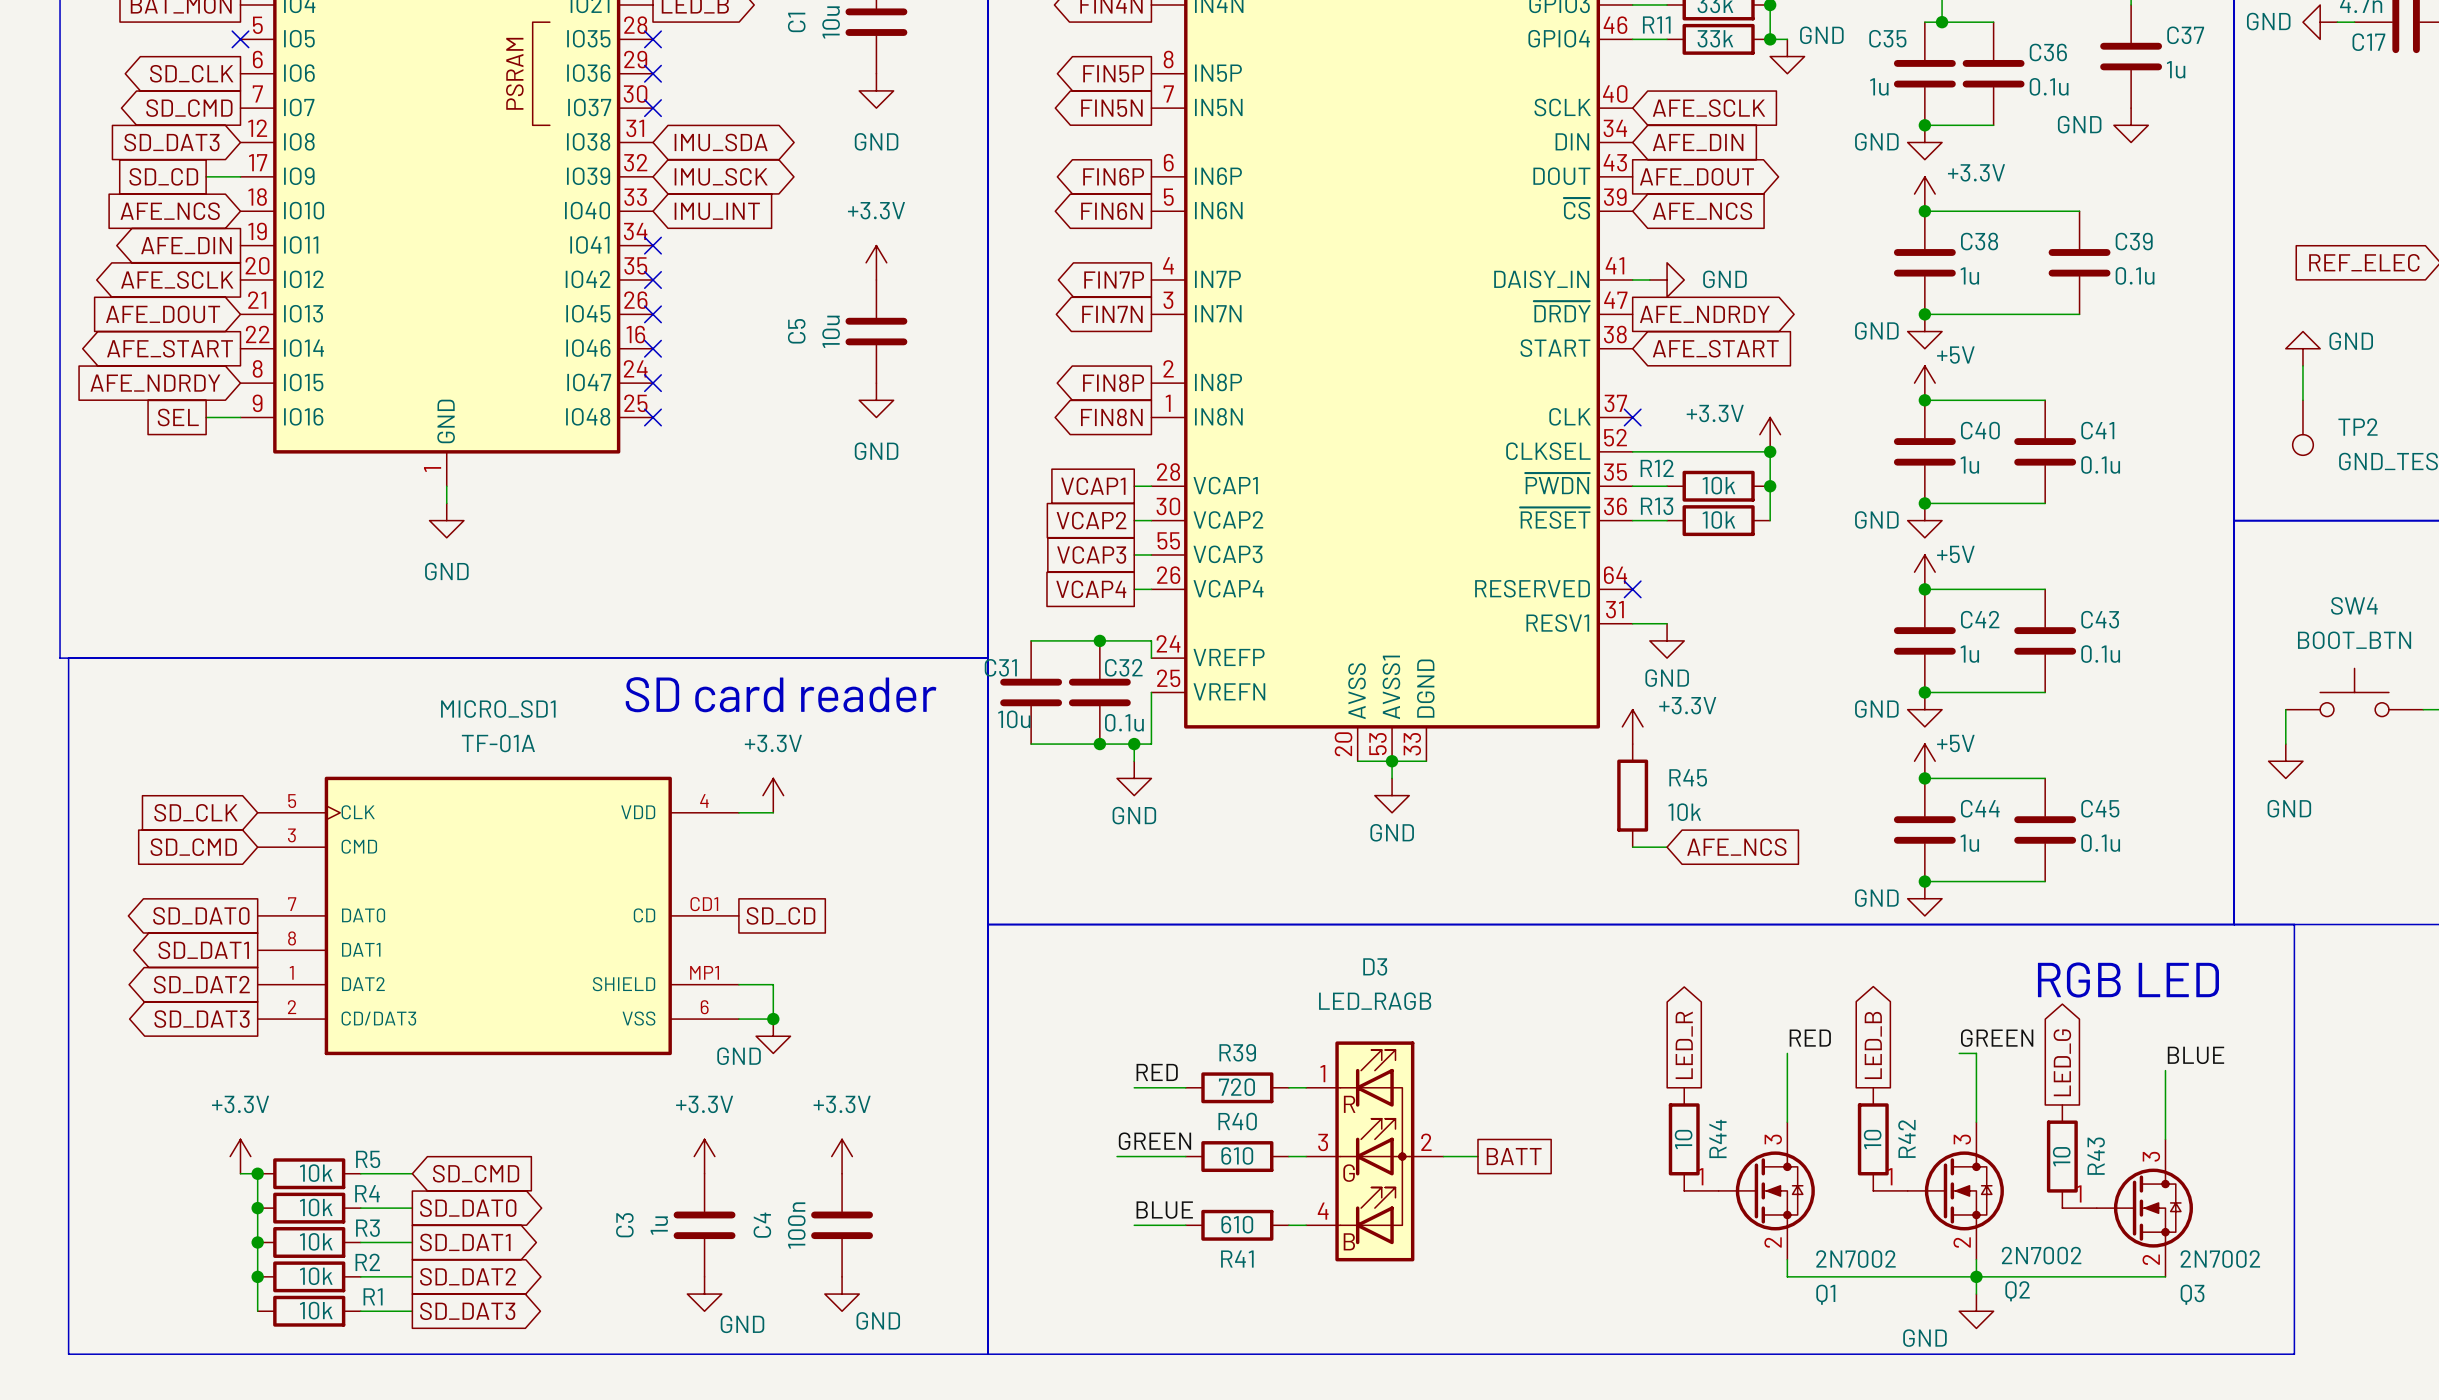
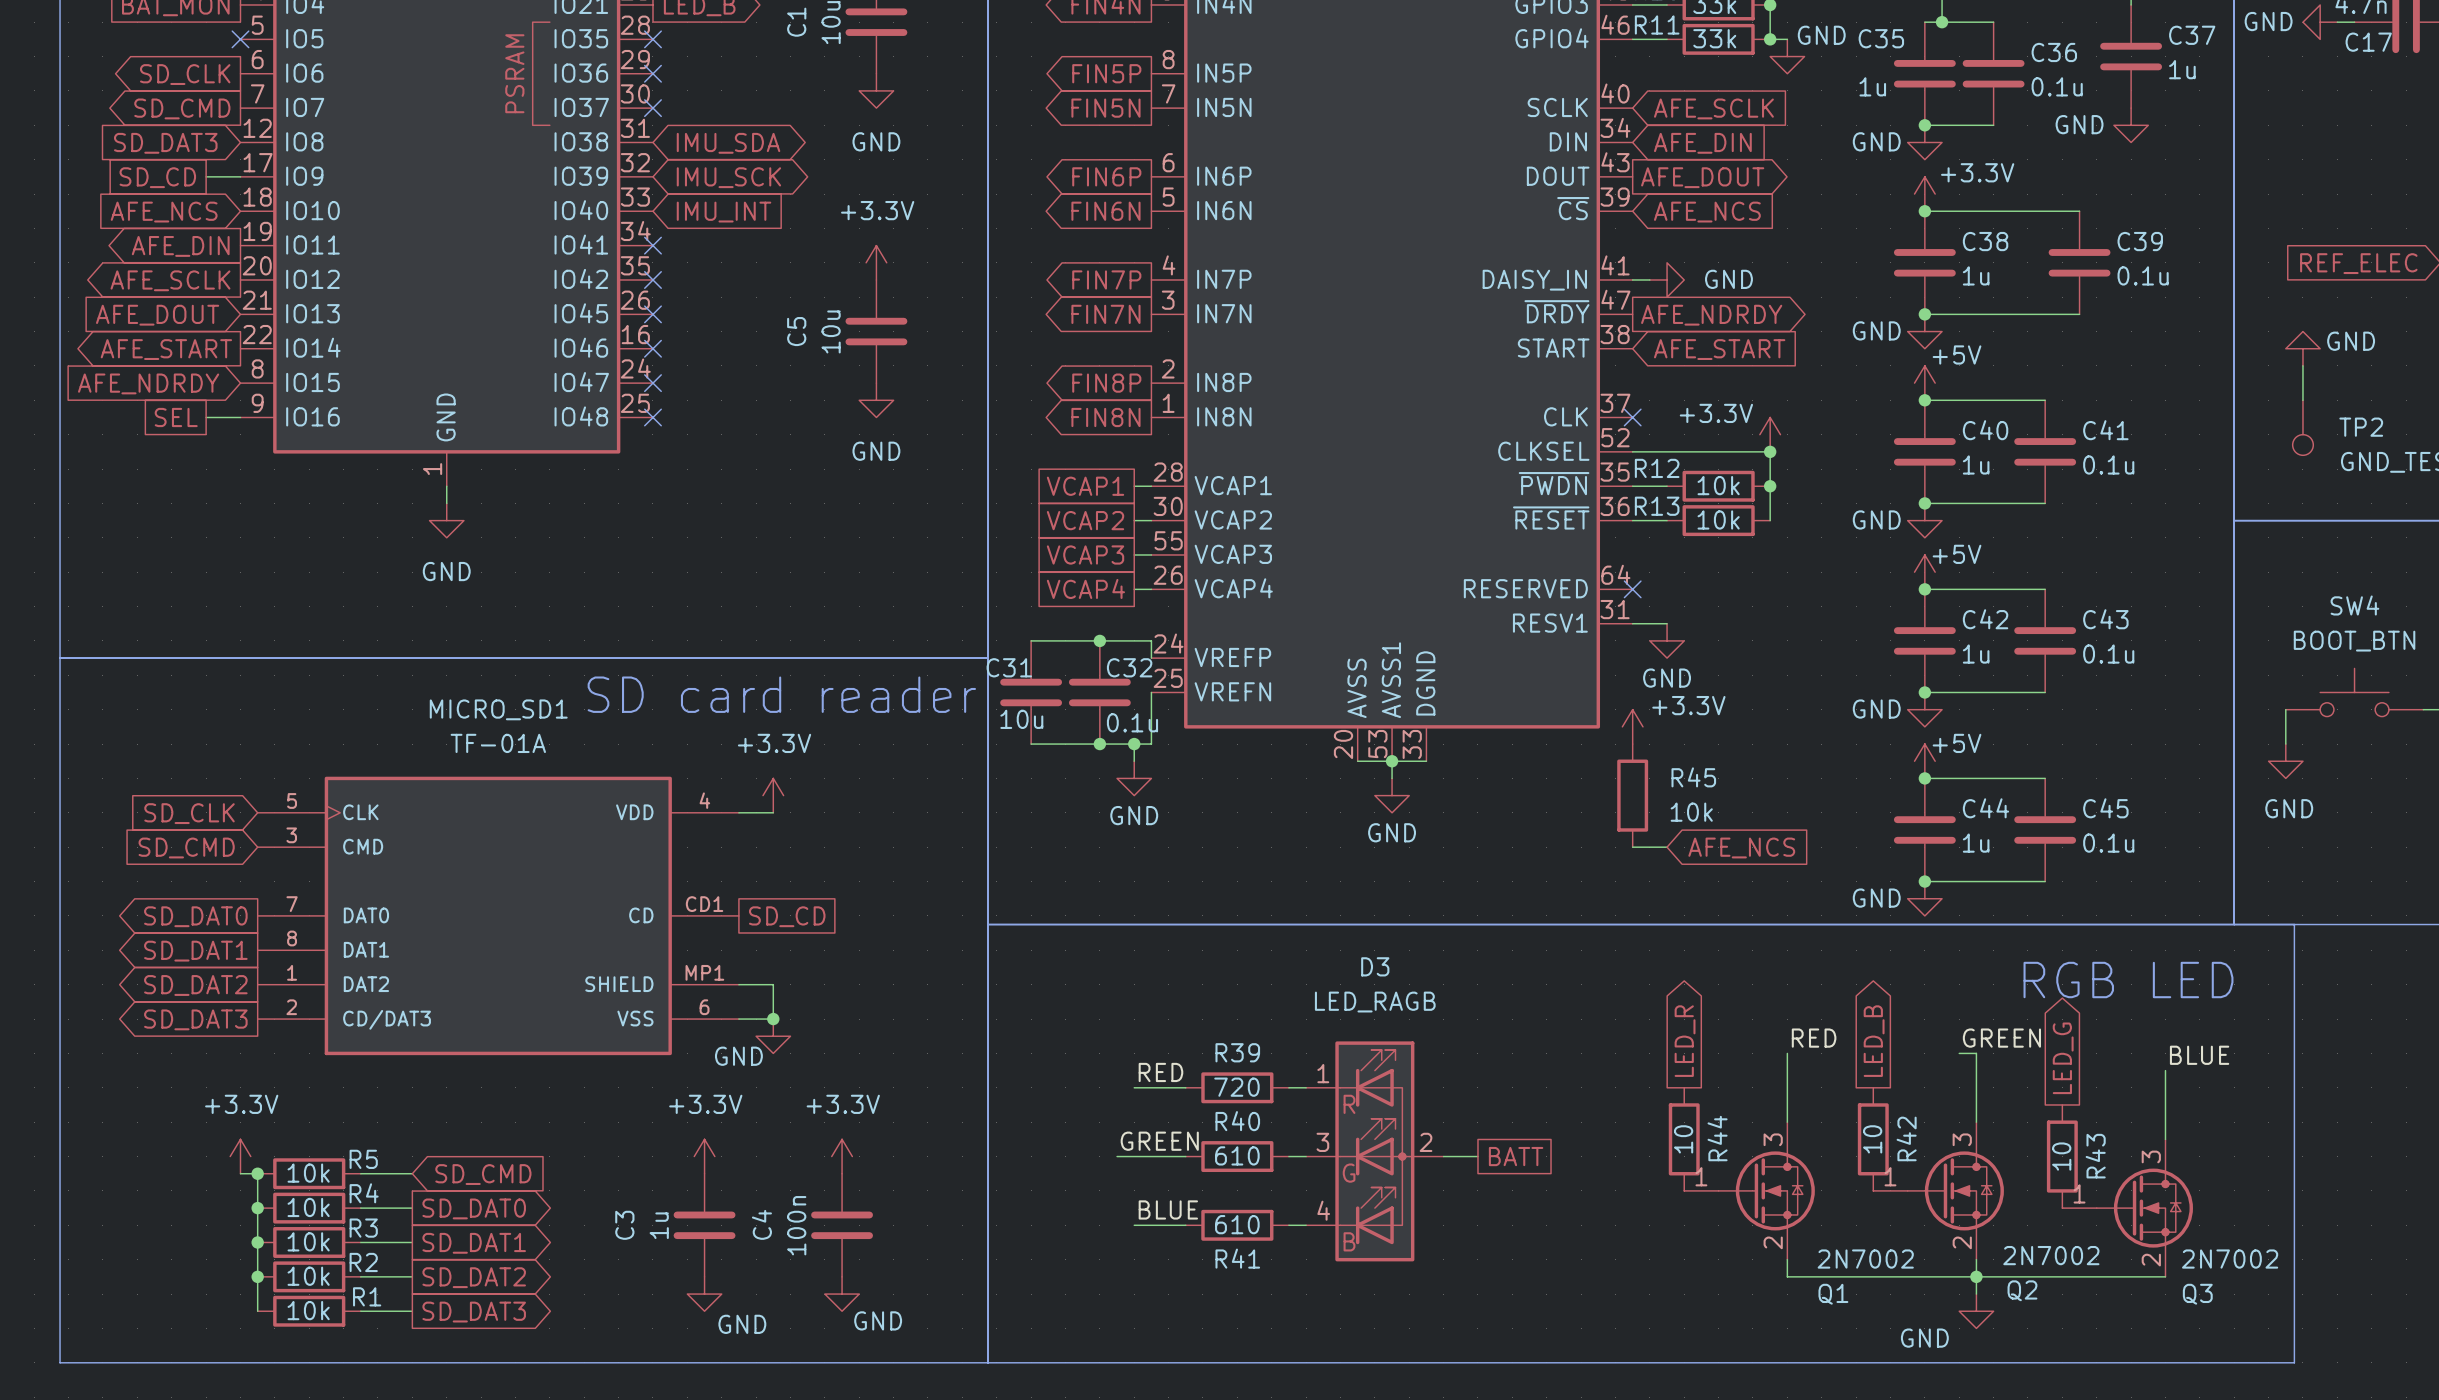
line: (68, 658) (68, 1354) (2294, 1354) -> (60, 658) (60, 1362) (2294, 1362) (2294, 1354)
line: none -> (988, 1354) (988, 1362)

